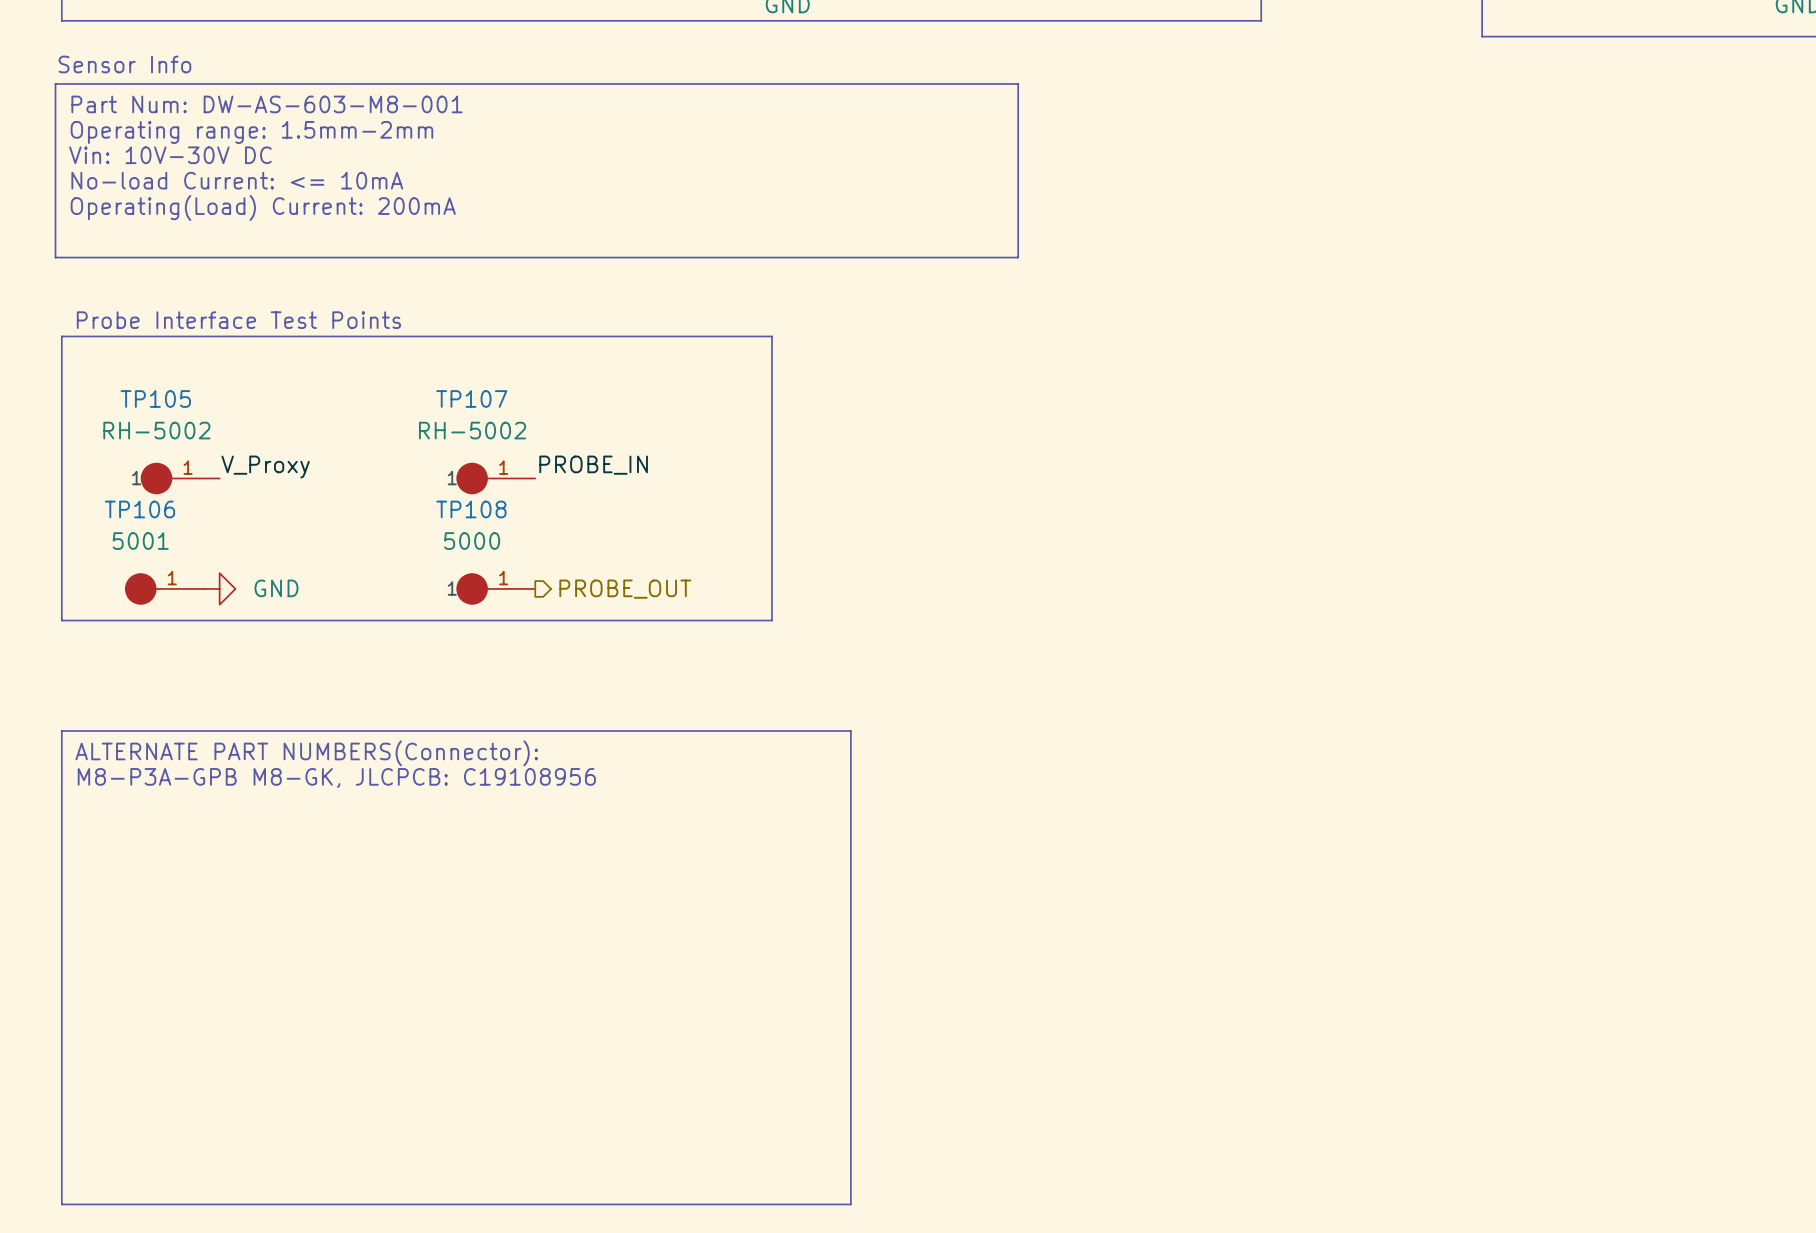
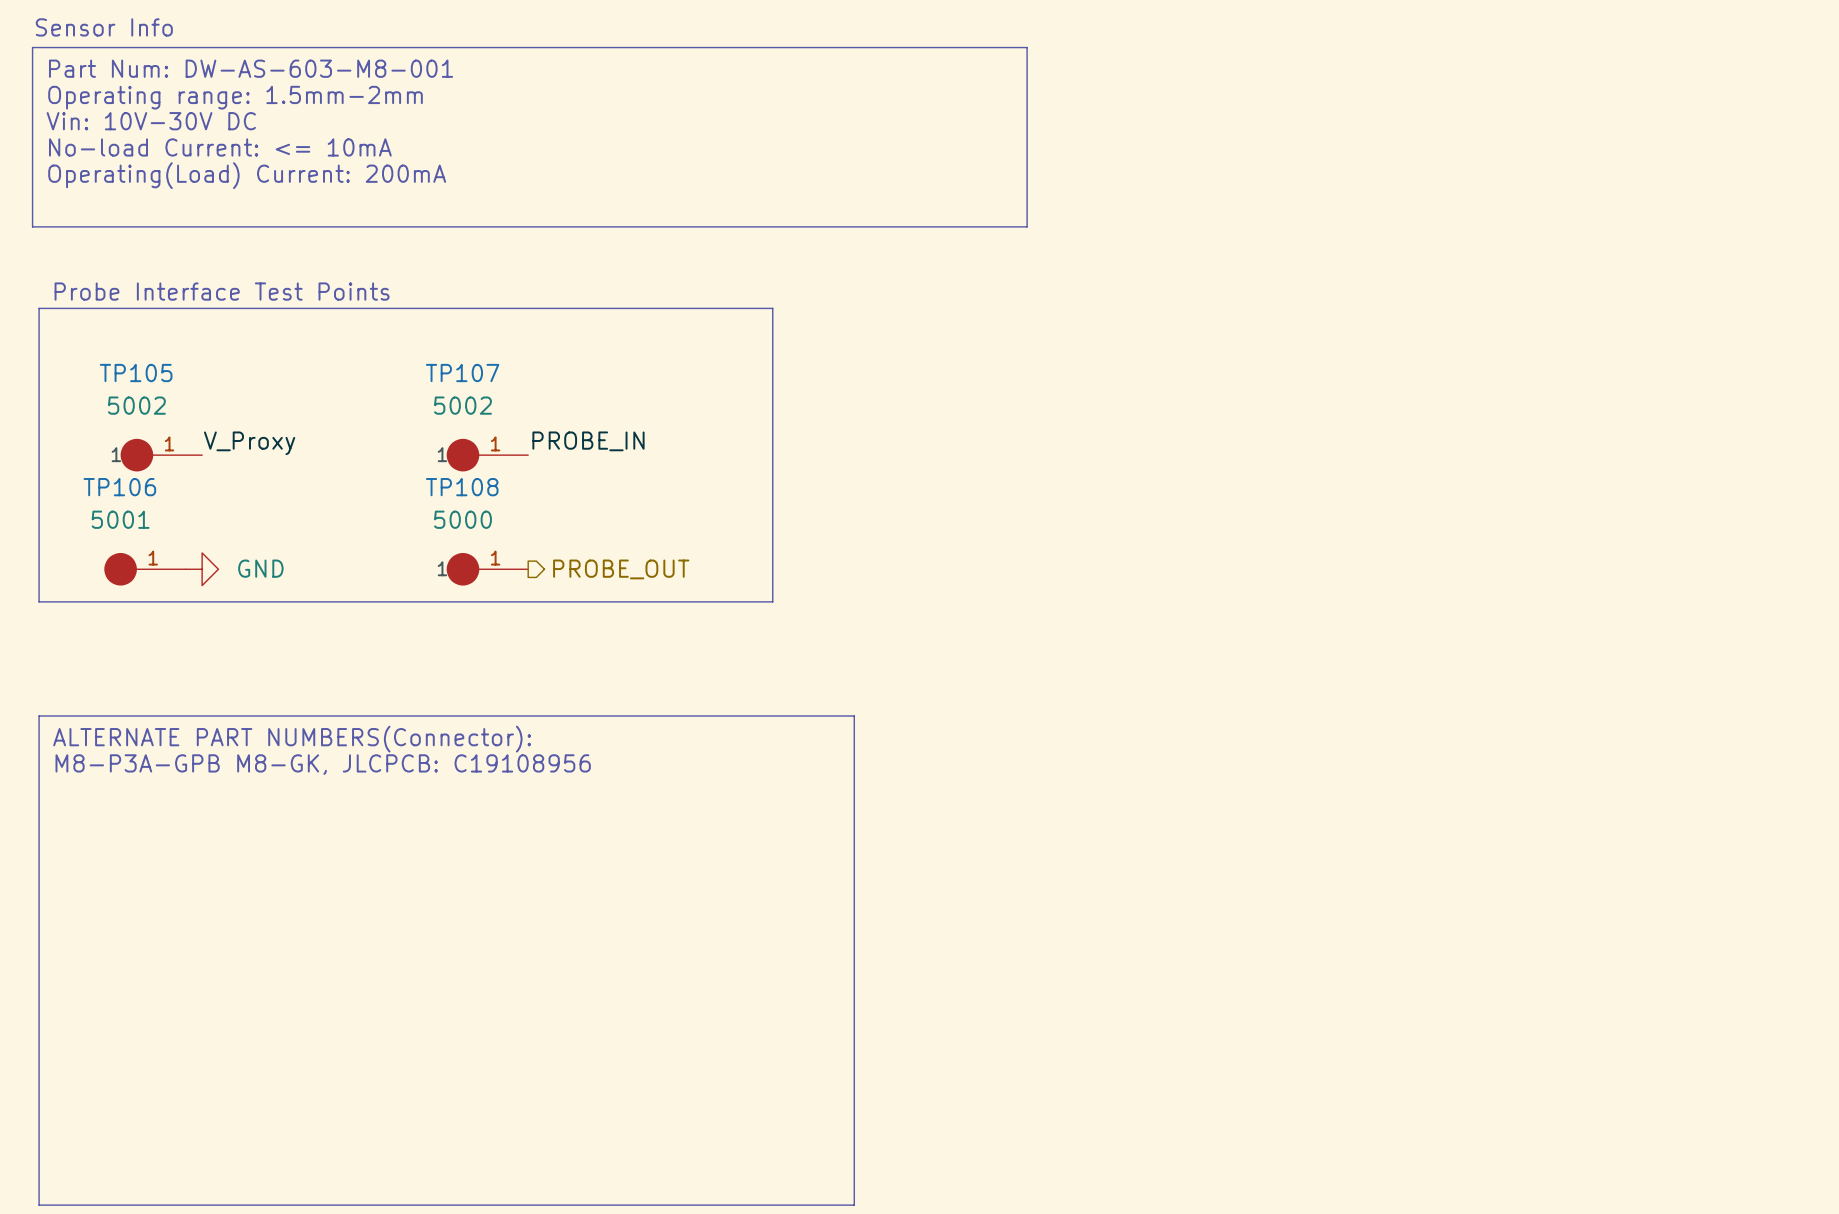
TP105 value: RH-5002 (156, 430) -> 5002 (136, 405)
TP107 value: RH-5002 (472, 430) -> 5002 (462, 405)

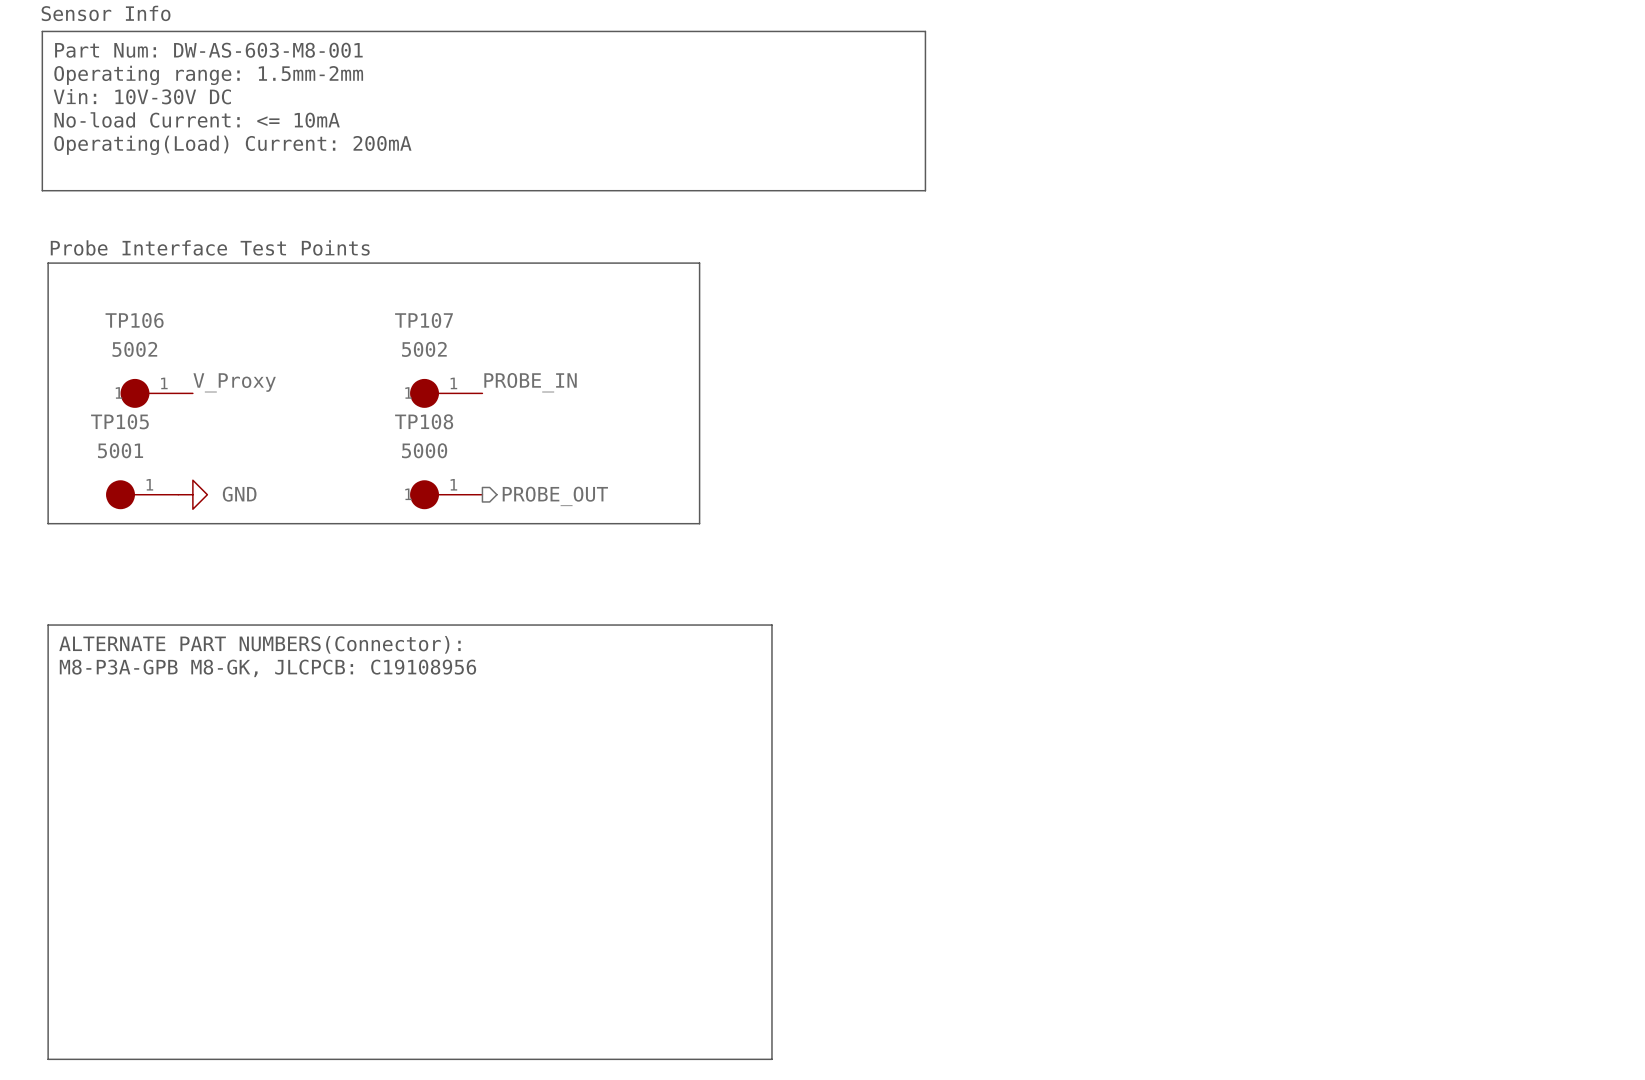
TP105 name: TP105 (136, 373) -> TP106 (134, 320)
TP106 name: TP106 (119, 487) -> TP105 (119, 421)

